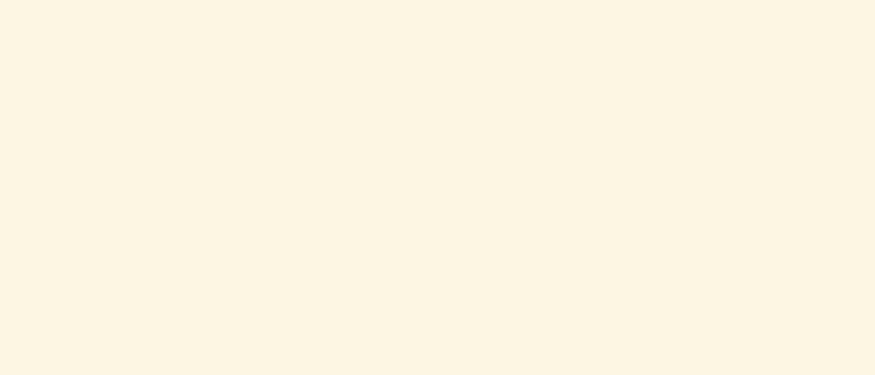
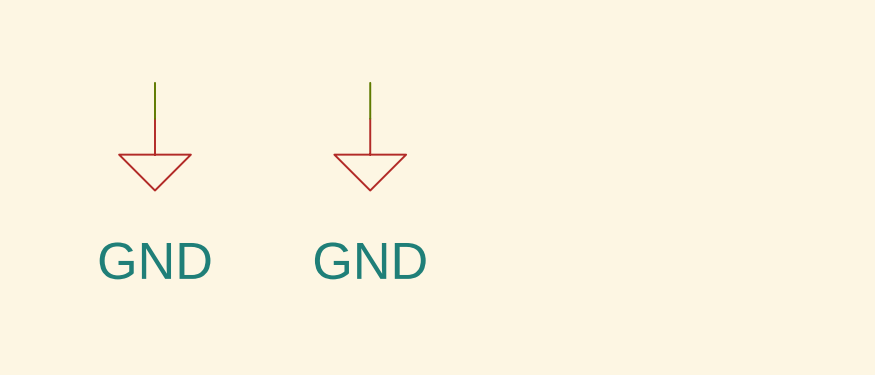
wire: none -> (154, 82) (154, 118)
wire: none -> (370, 82) (370, 118)
power symbol: none -> GND (154, 154)
power symbol: none -> GND (370, 154)

